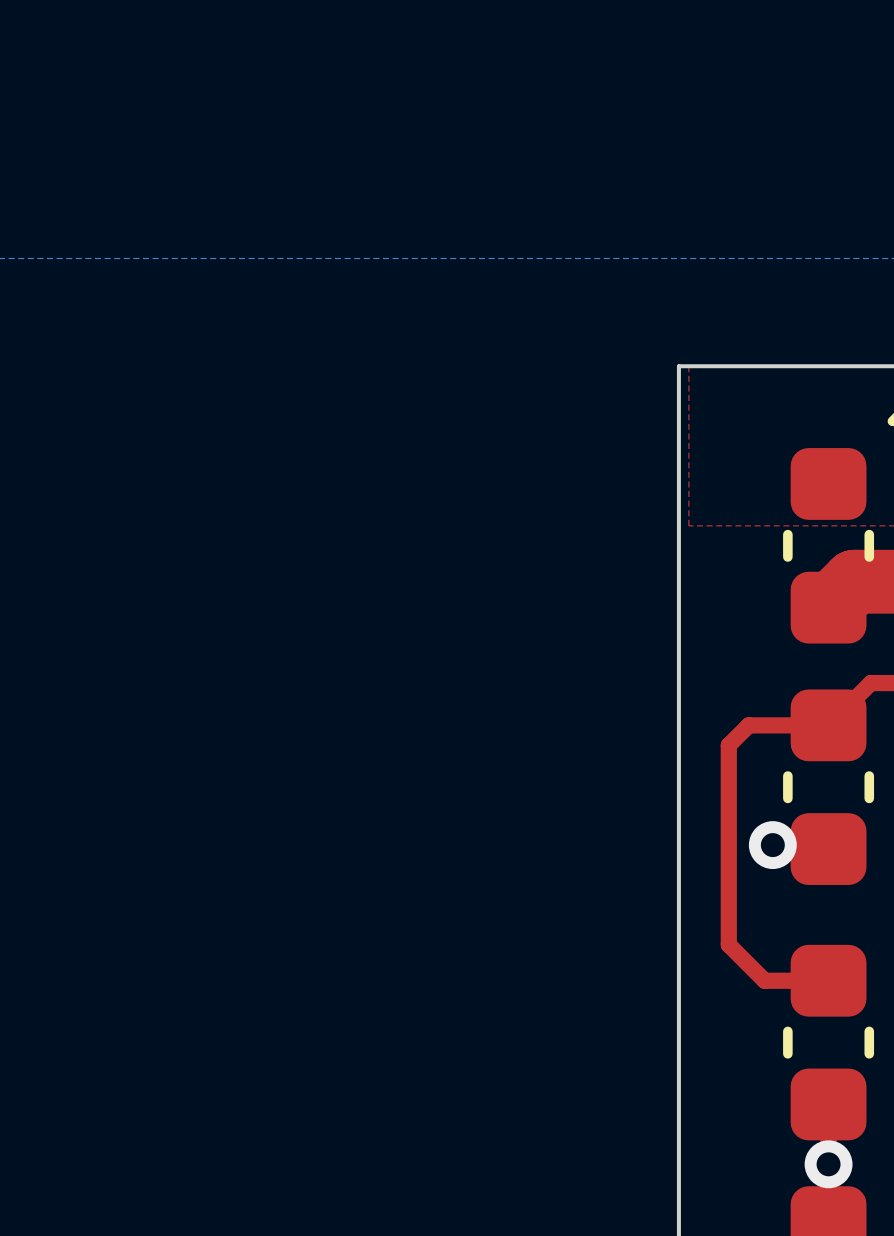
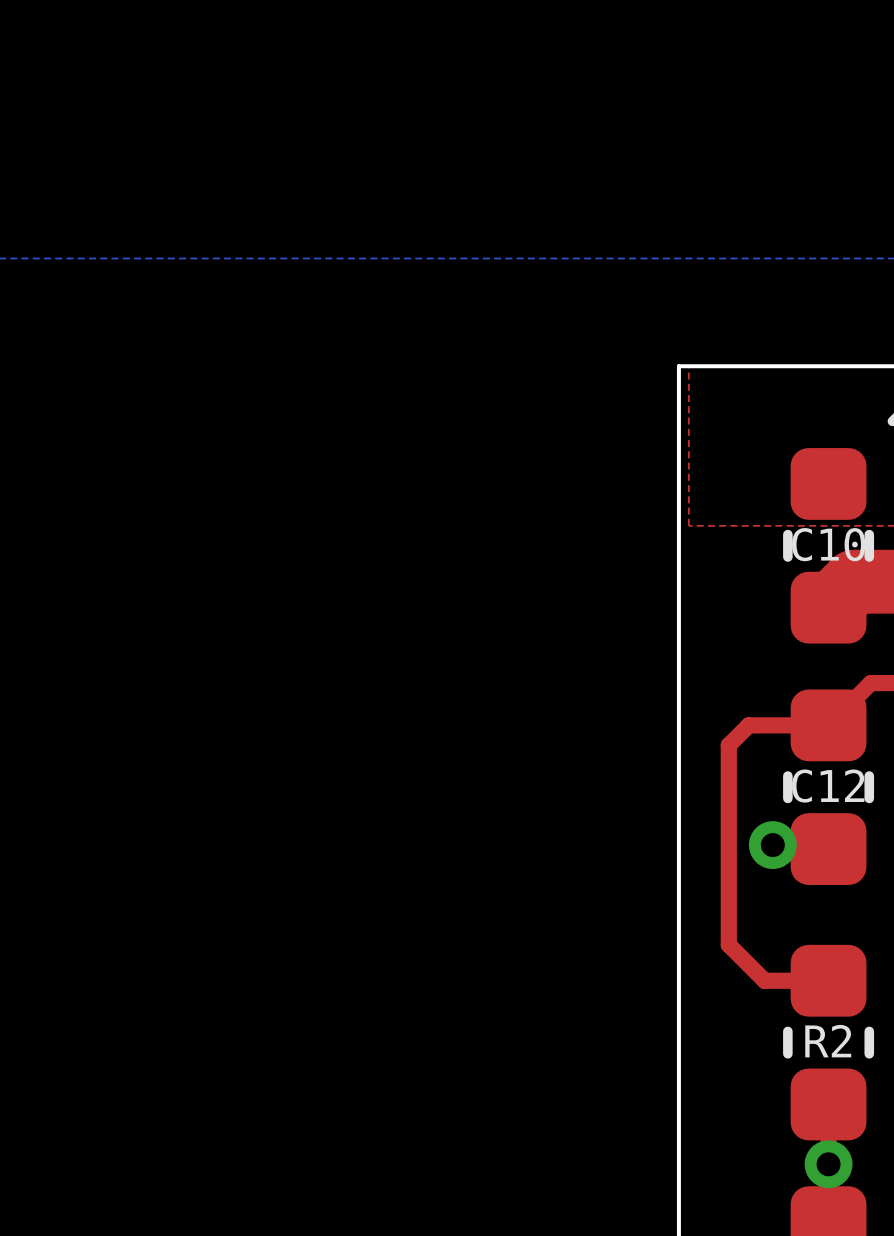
C10 name: none -> C10 (828, 544)
C12 name: none -> C12 (828, 786)
R2 name: none -> R2 (828, 1041)

